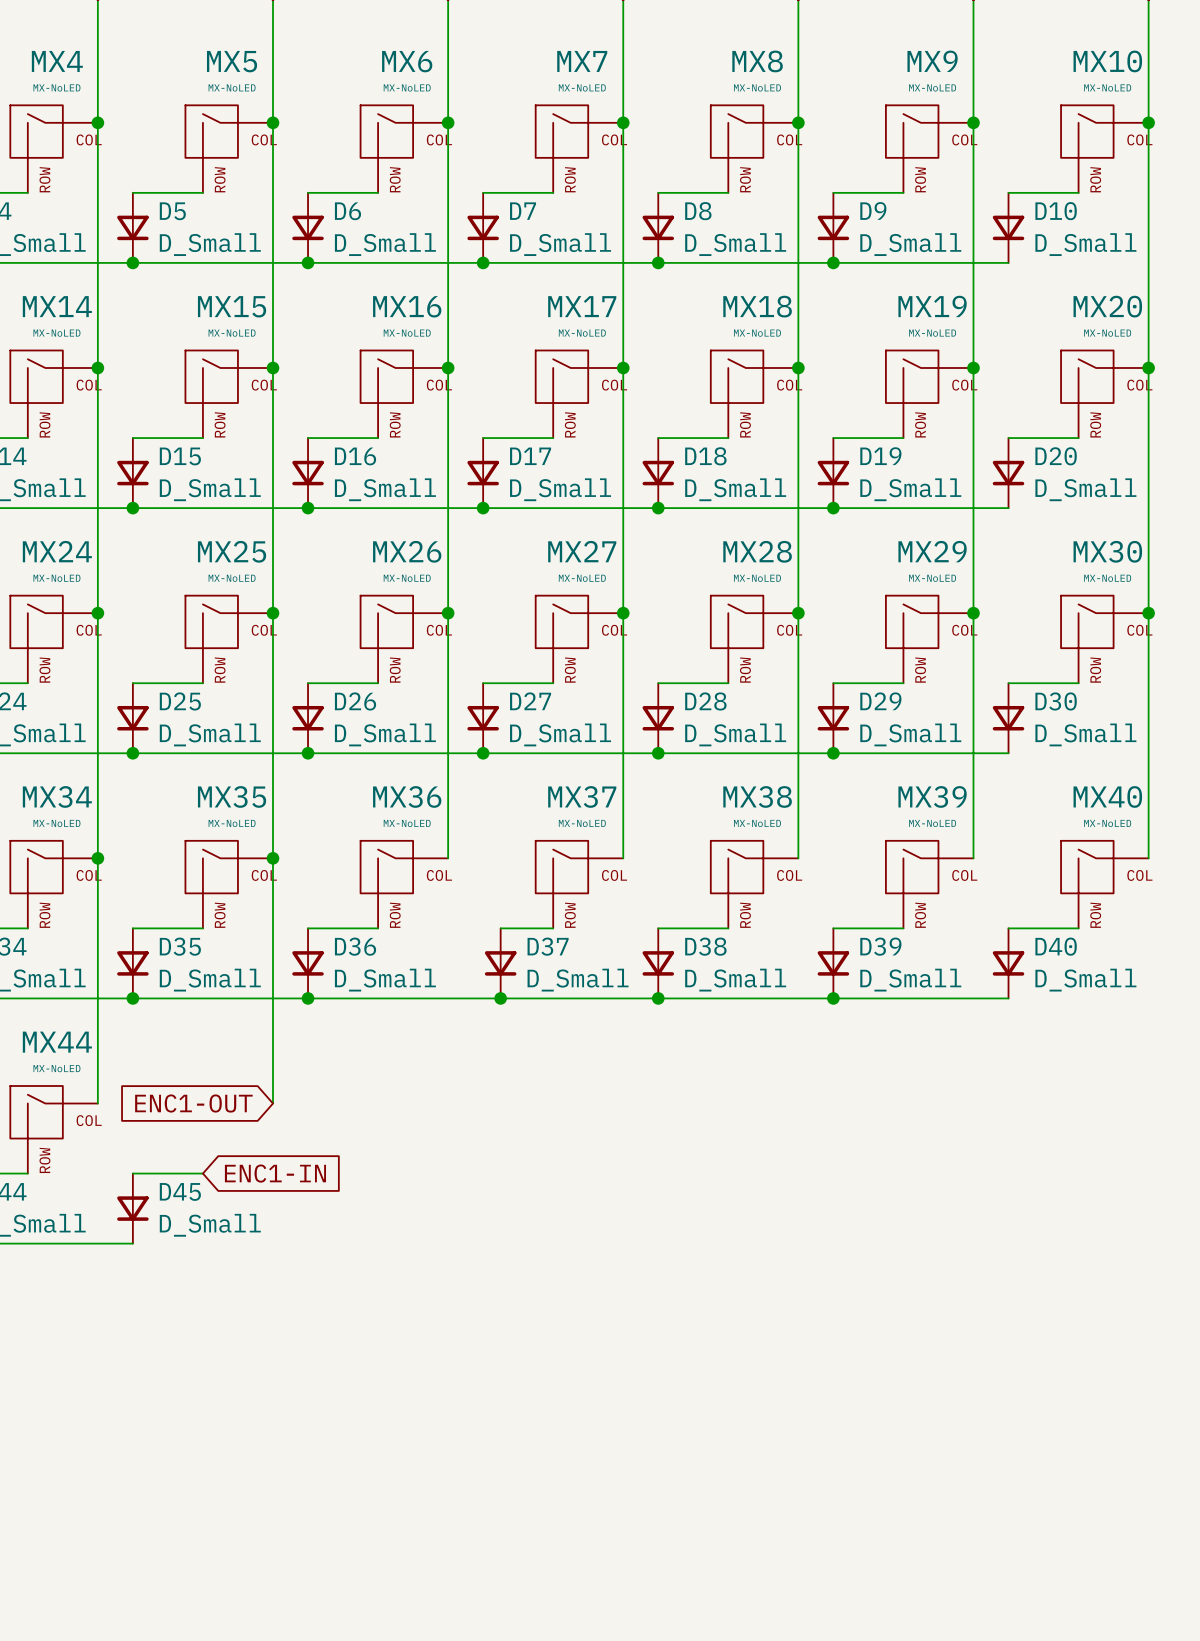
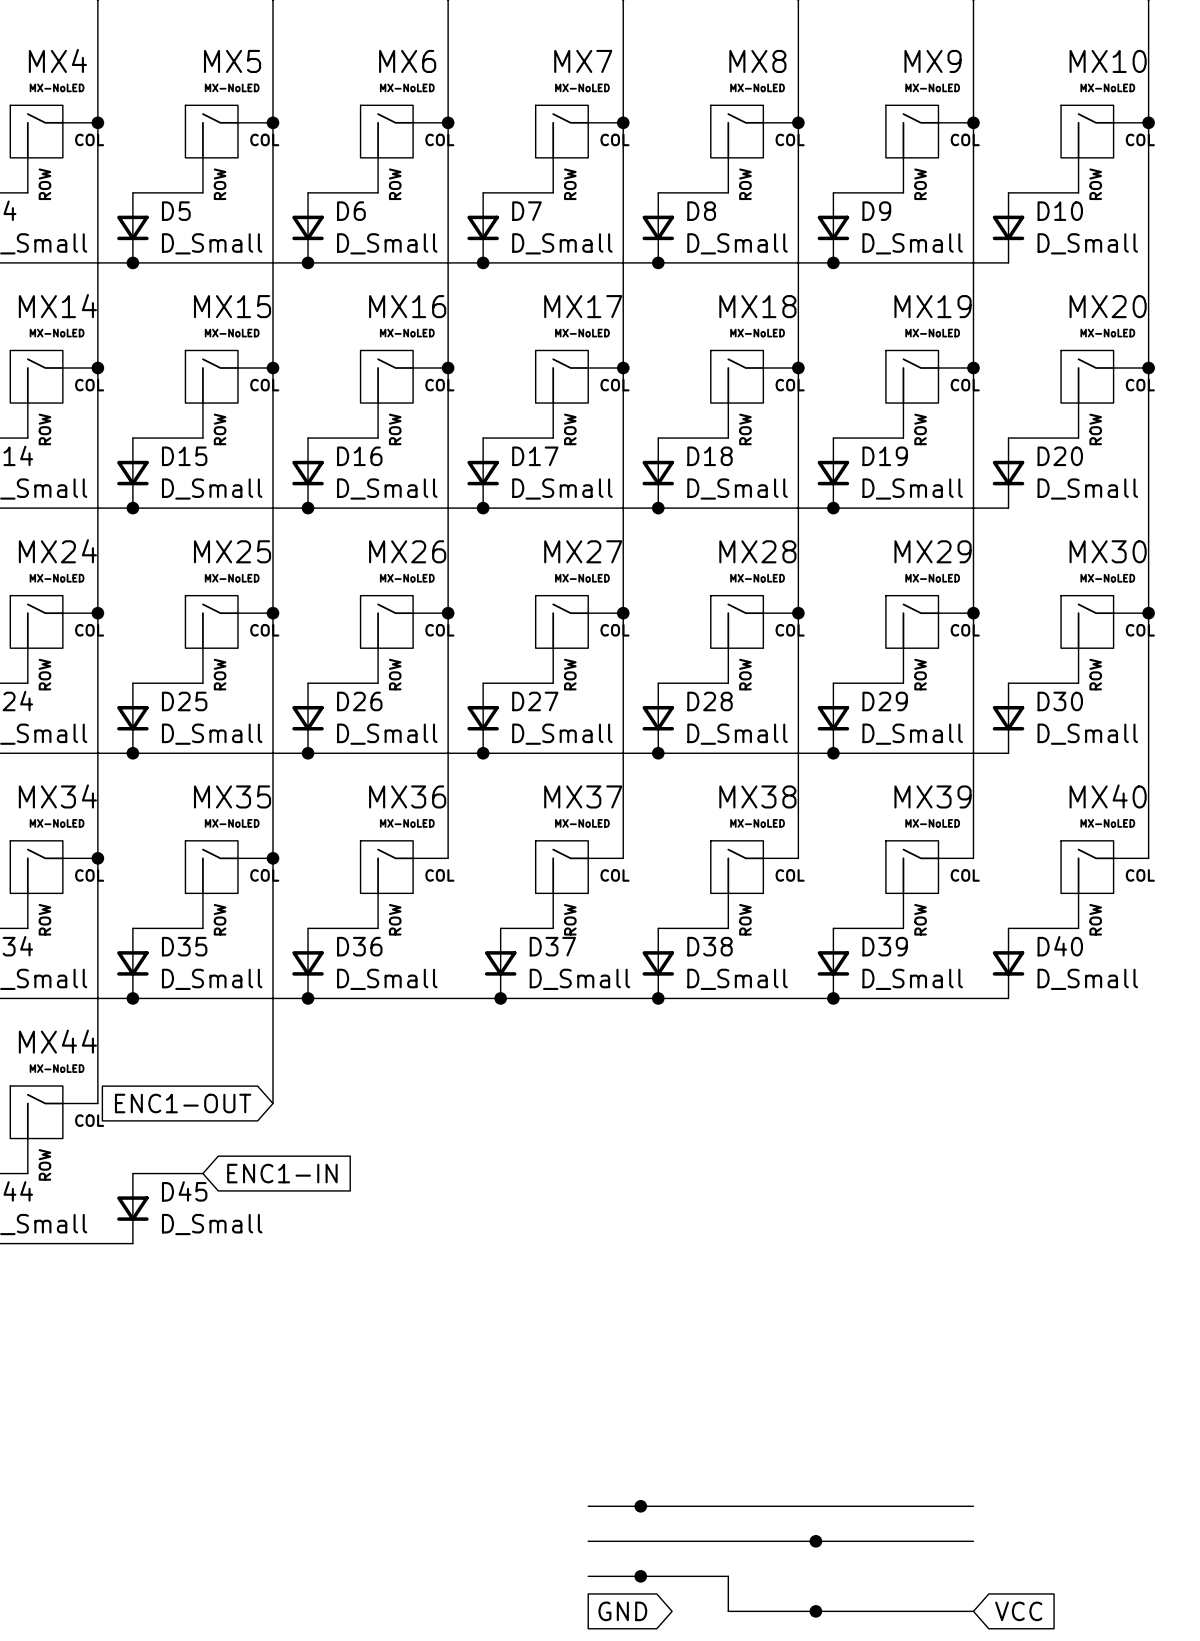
wire: none -> (588, 1506) (973, 1506)
junction: none -> (640, 1506)
wire: none -> (588, 1541) (973, 1541)
junction: none -> (815, 1541)
wire: none -> (588, 1576) (728, 1576) (728, 1611) (973, 1611)
junction: none -> (640, 1576)
global label: none -> GND (622, 1611)
junction: none -> (815, 1611)
global label: none -> VCC (1018, 1611)

